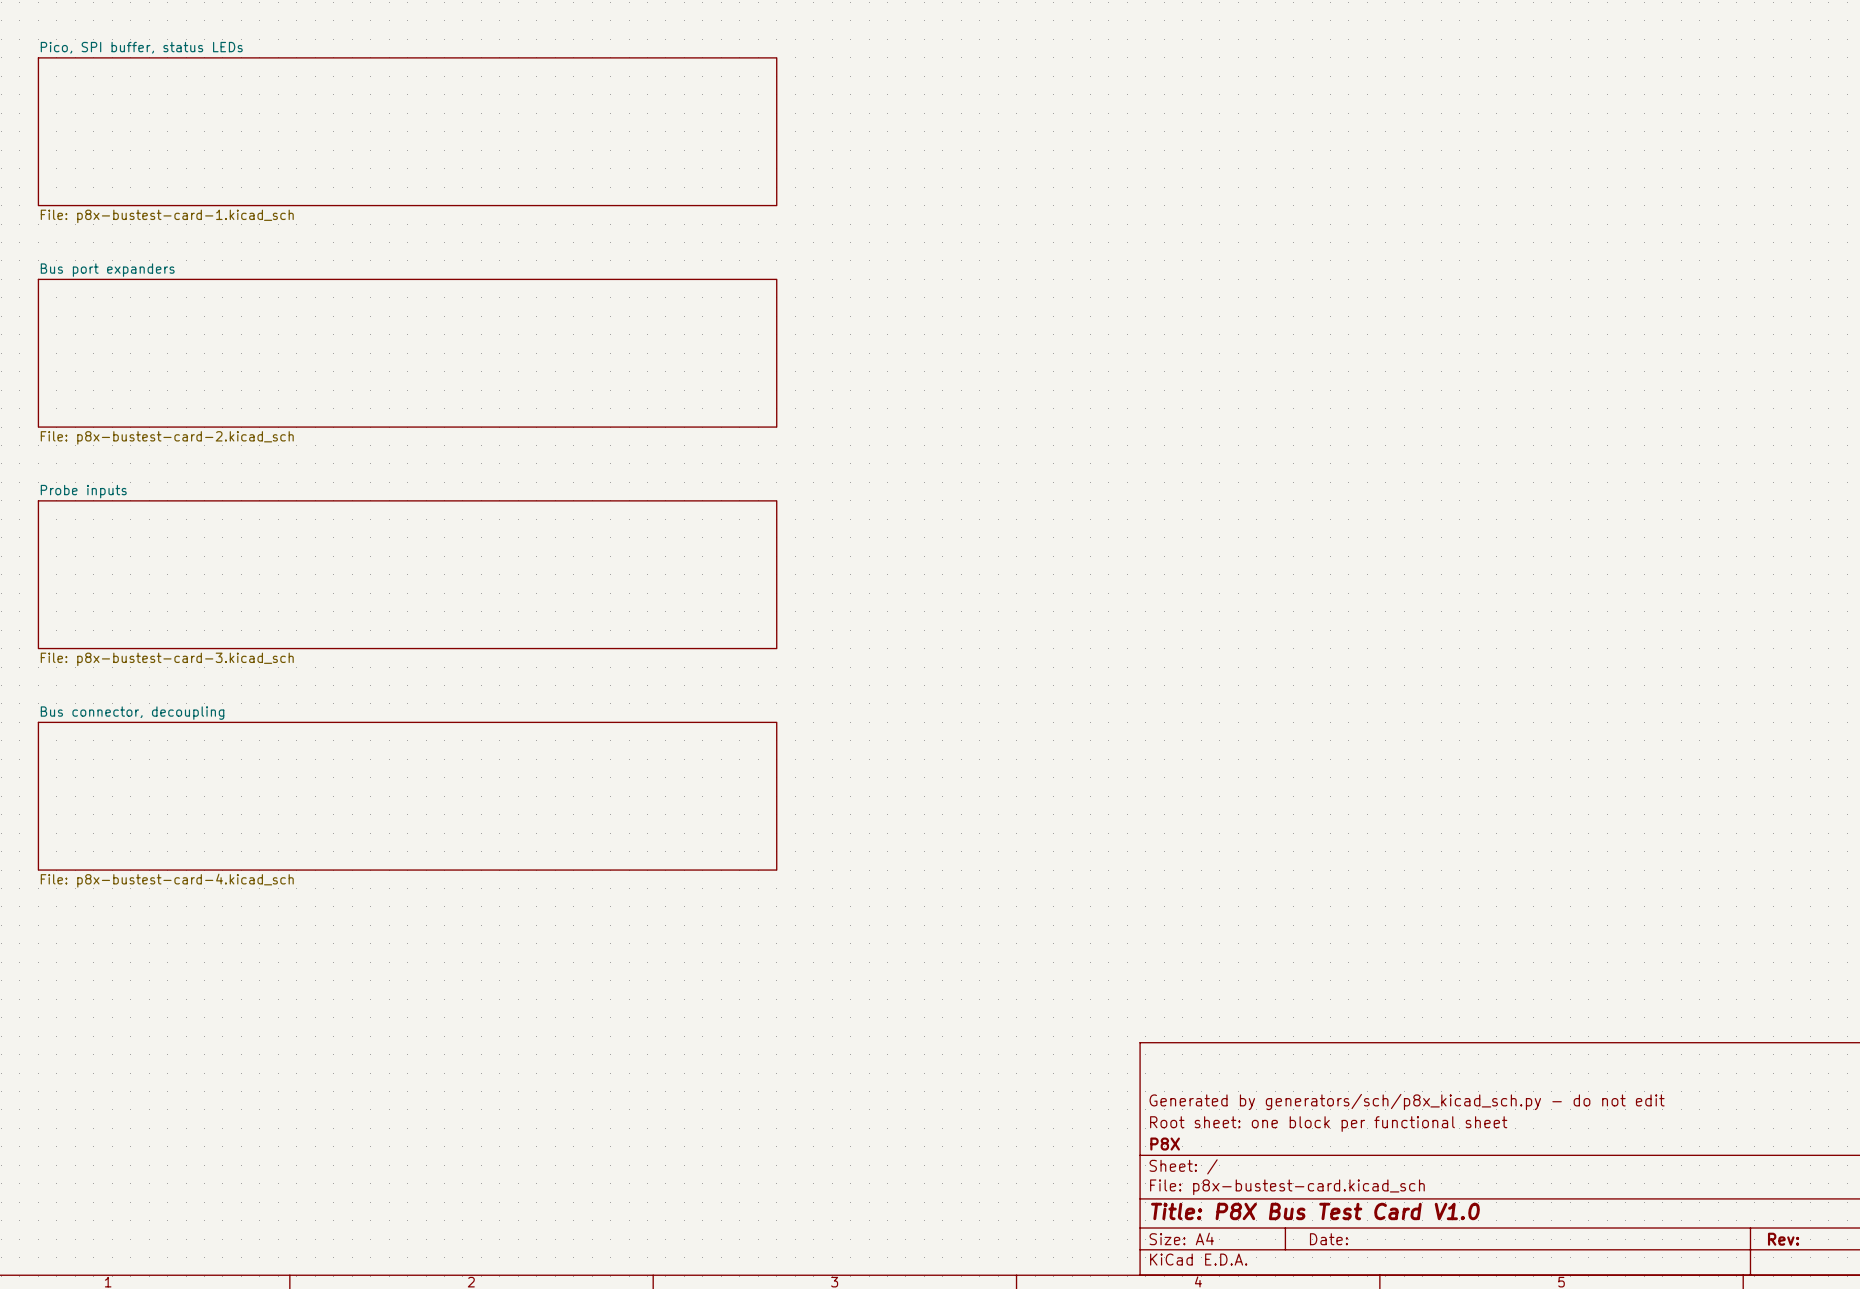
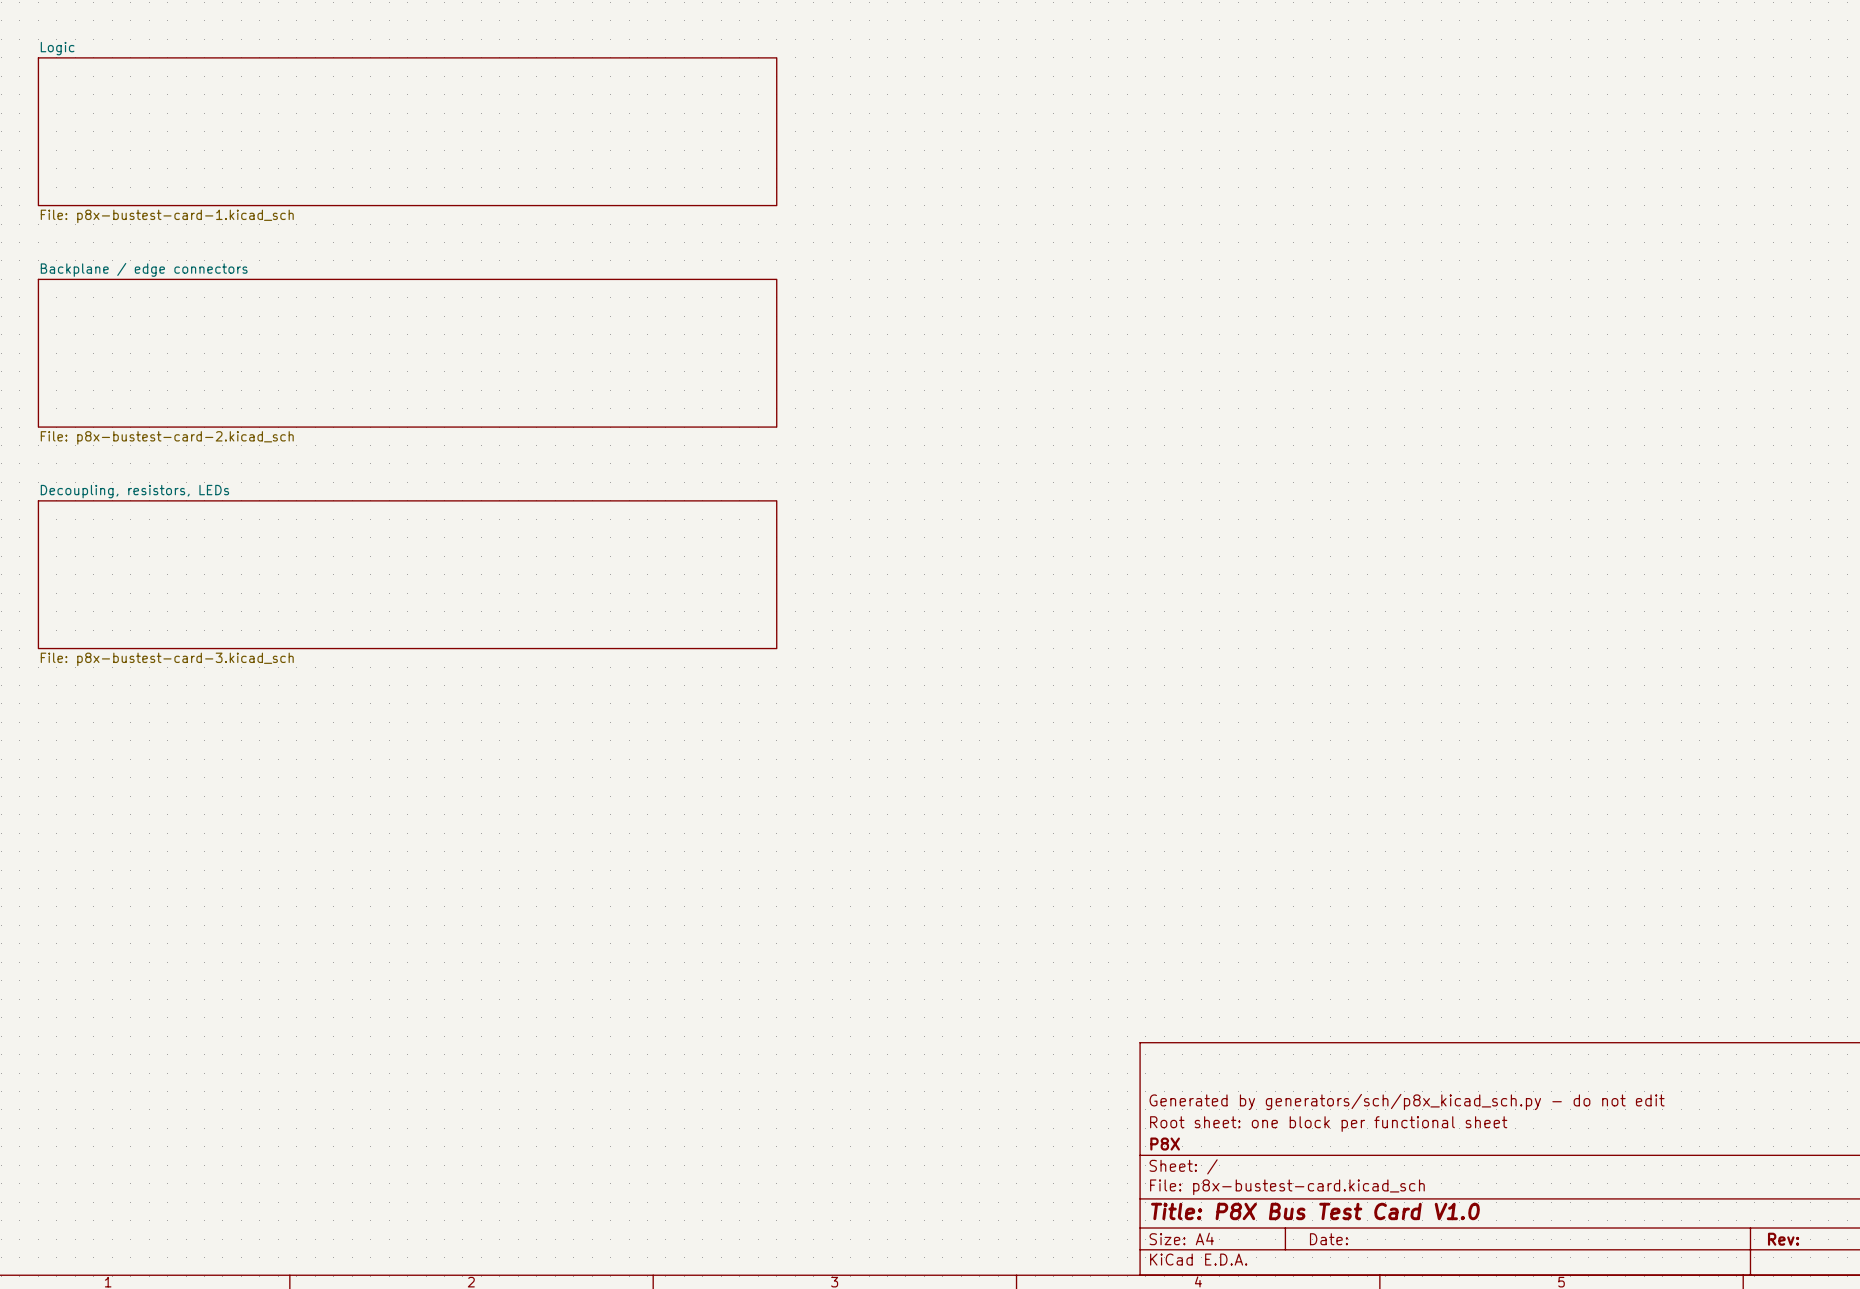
sheet Pico, SPI buffer, status LEDs name: Pico, SPI buffer, status LEDs (141, 47) -> Logic (57, 48)
sheet Bus port expanders name: Bus port expanders (107, 270) -> Backplane / edge connectors (144, 269)
sheet Probe inputs name: Probe inputs (83, 491) -> Decoupling, resistors, LEDs (134, 491)
sheet Bus connector, decoupling: File: p8x-bustest-card-4.kicad_sch (407, 796) -> none

